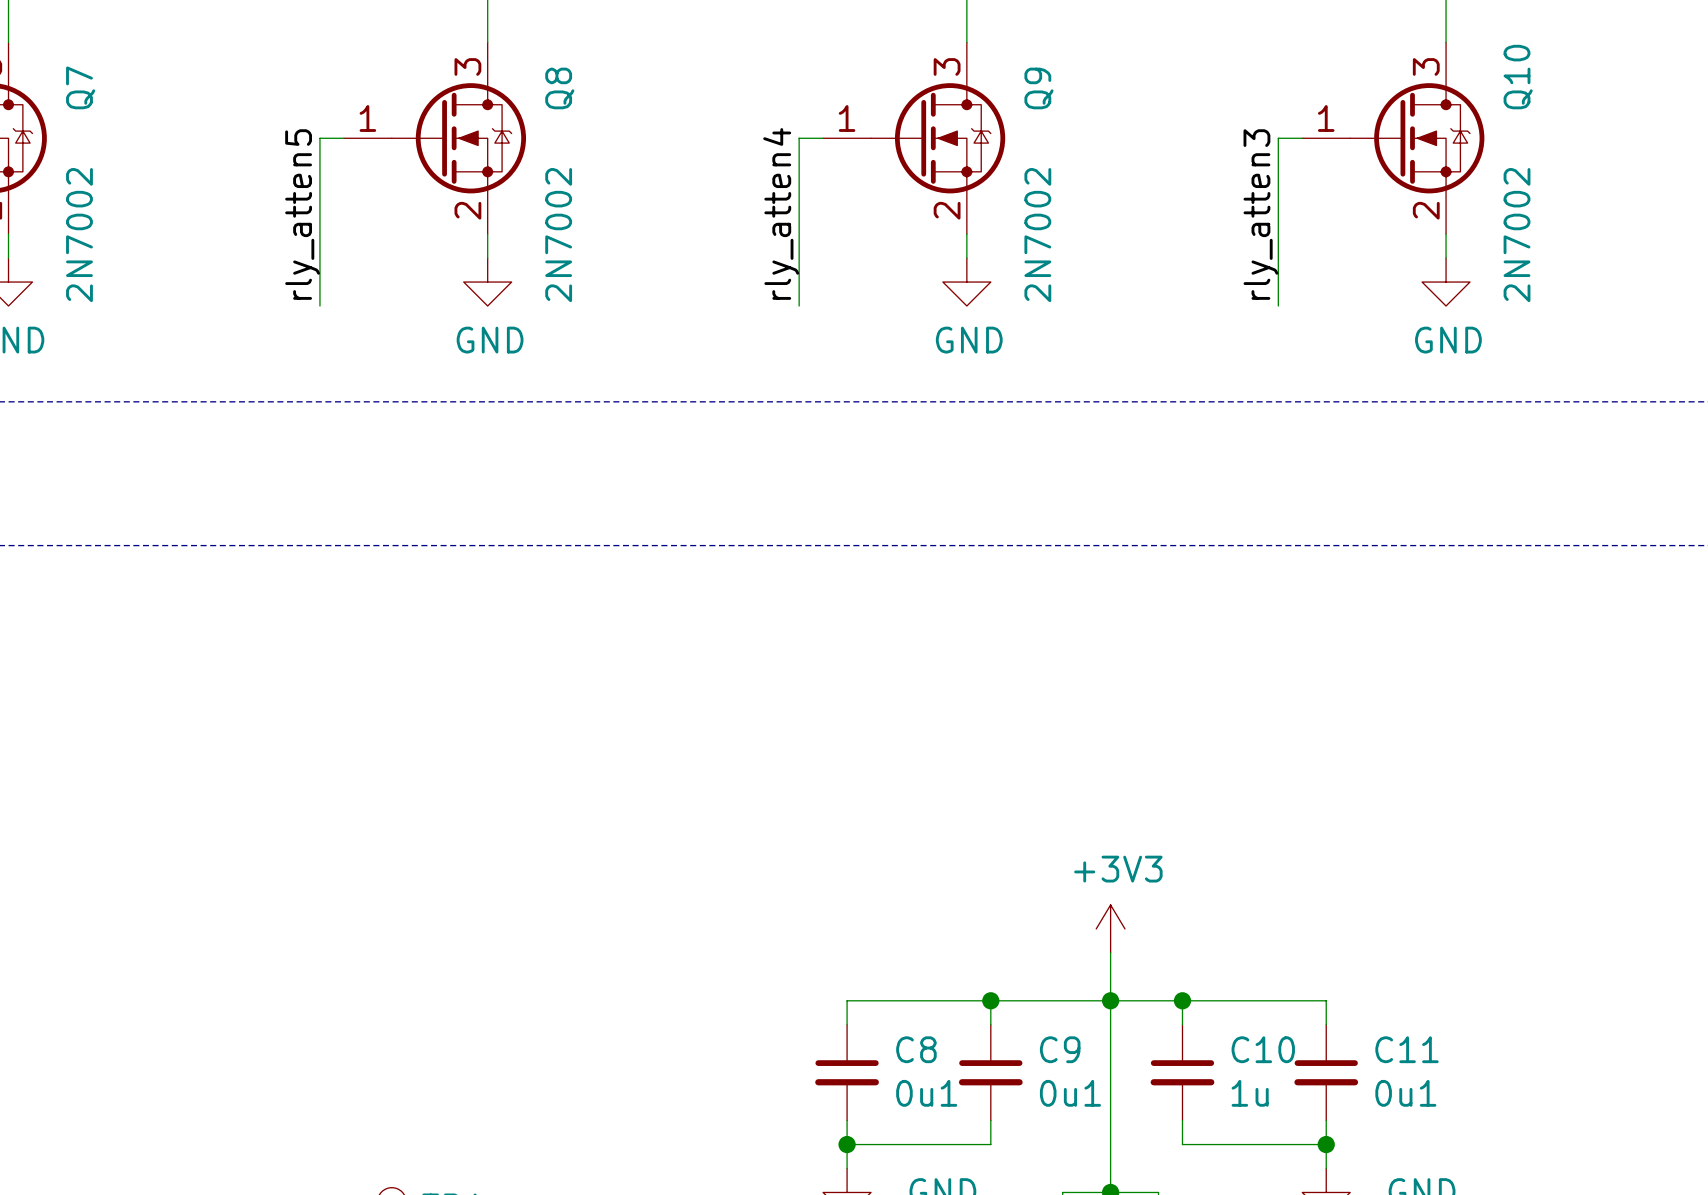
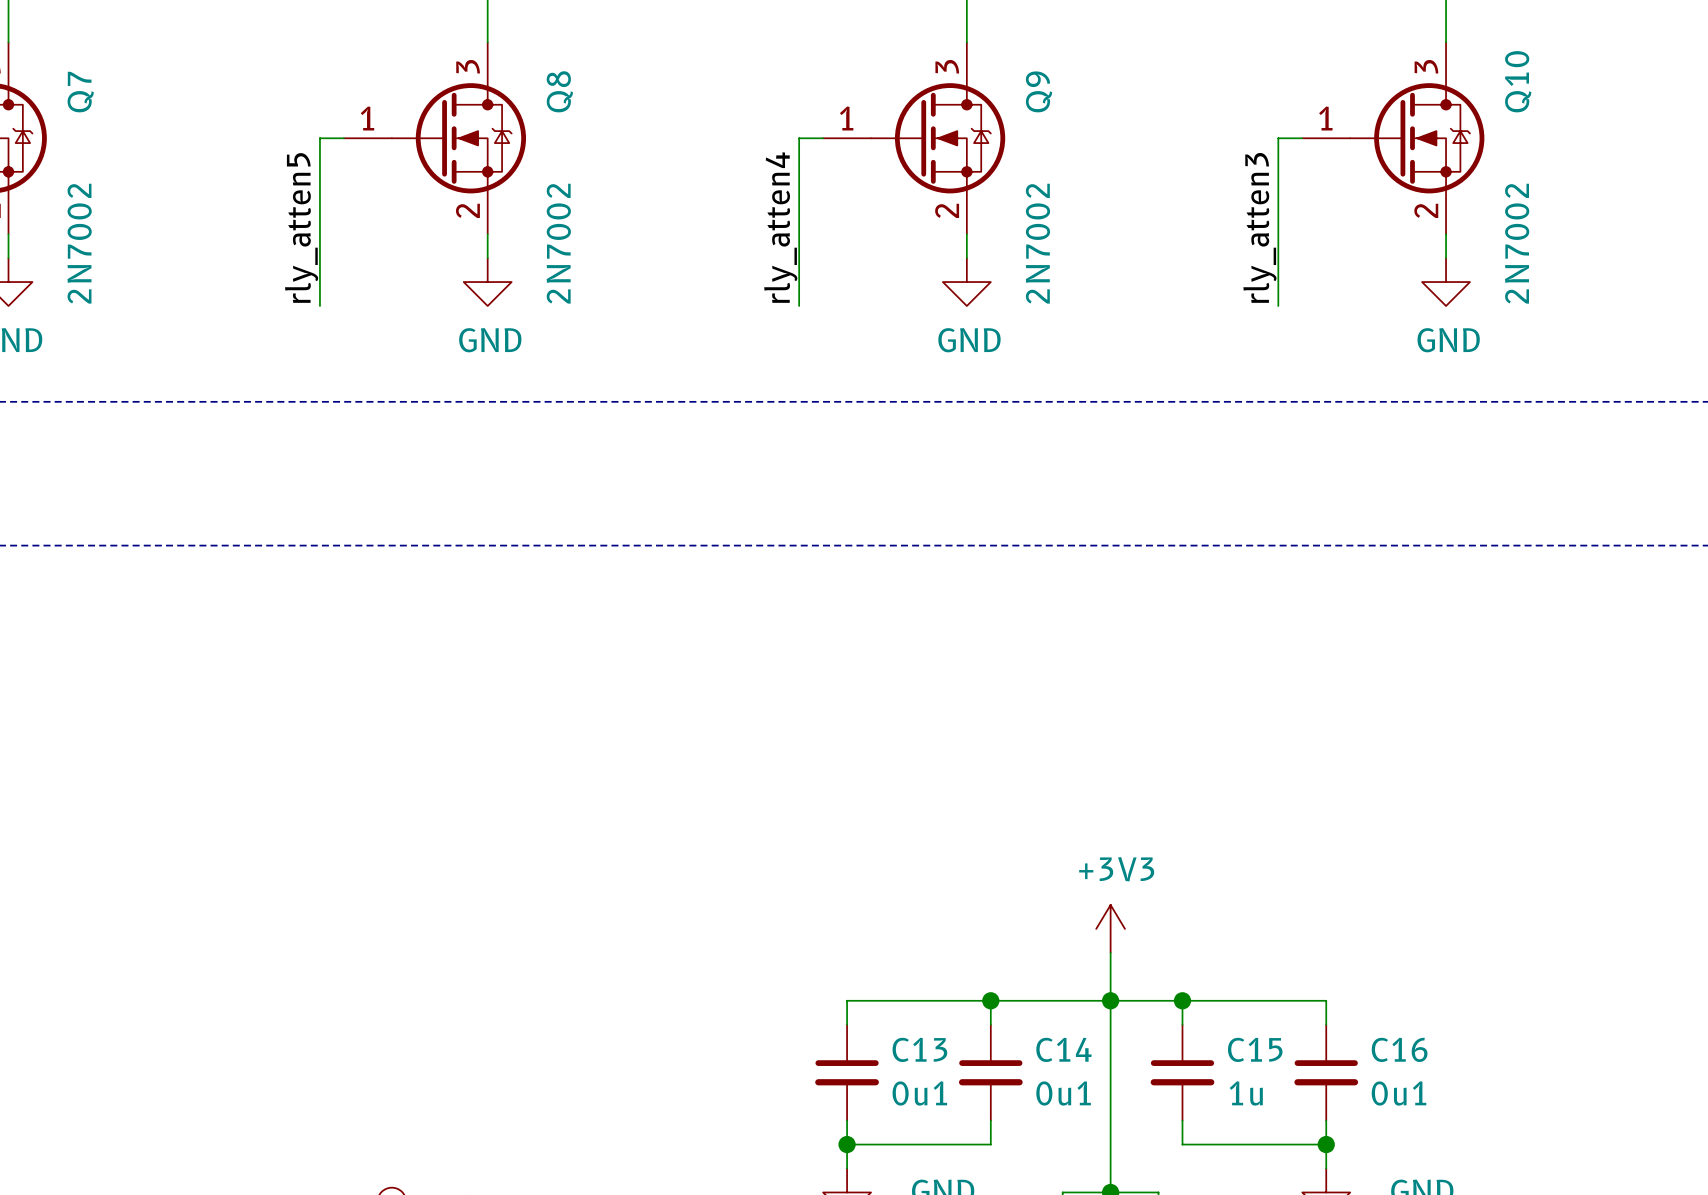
C8 name: C8 (916, 1049) -> C13 (919, 1049)
C9 name: C9 (1060, 1049) -> C14 (1063, 1049)
C10 name: C10 (1263, 1049) -> C15 (1255, 1049)
C11 name: C11 (1407, 1049) -> C16 (1399, 1049)

